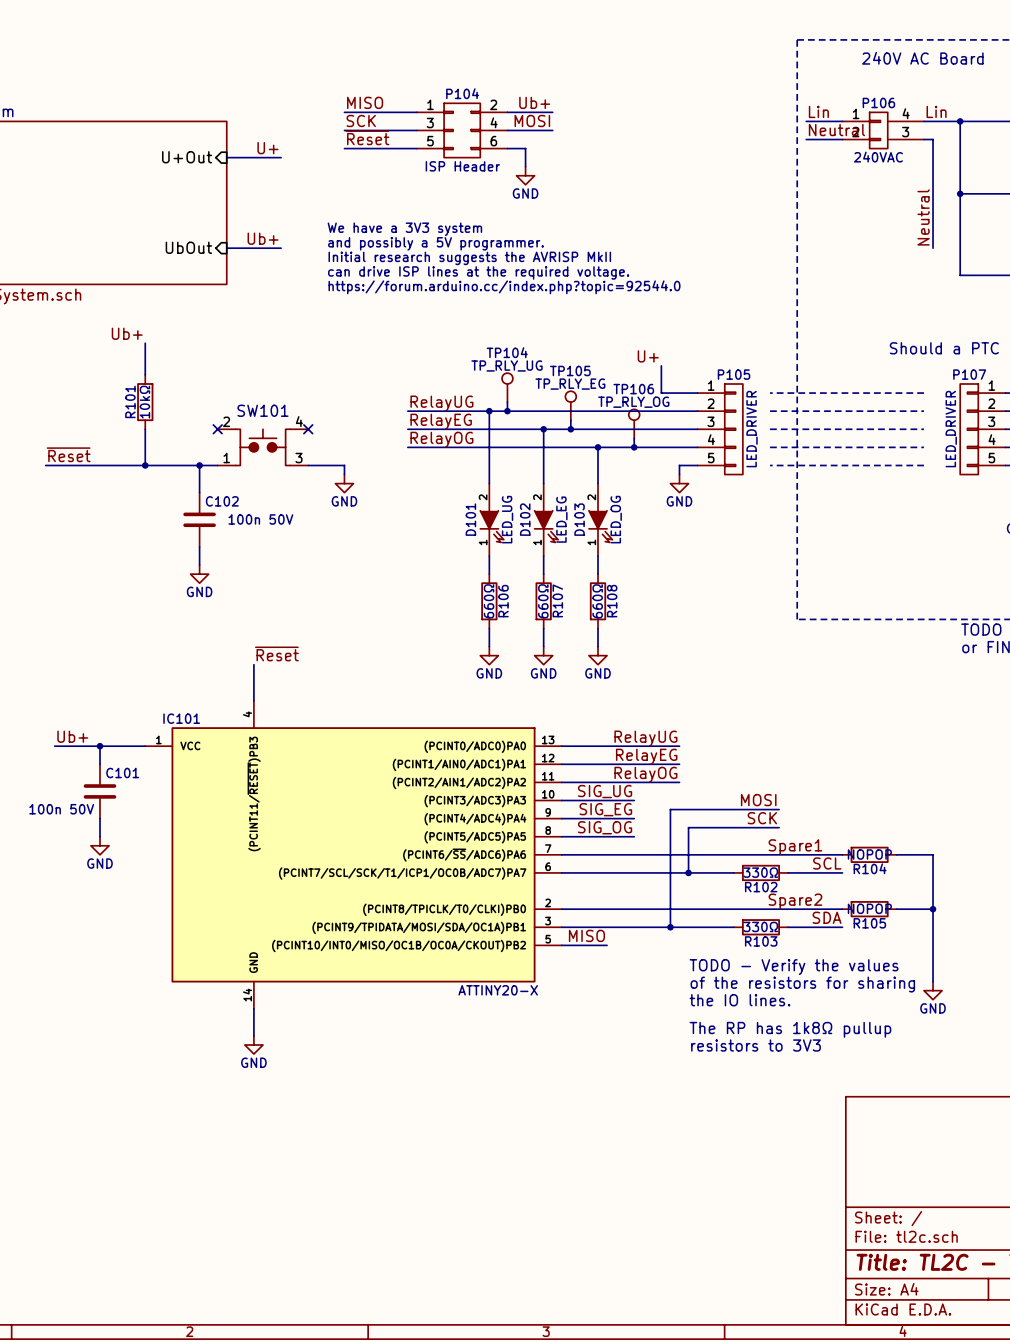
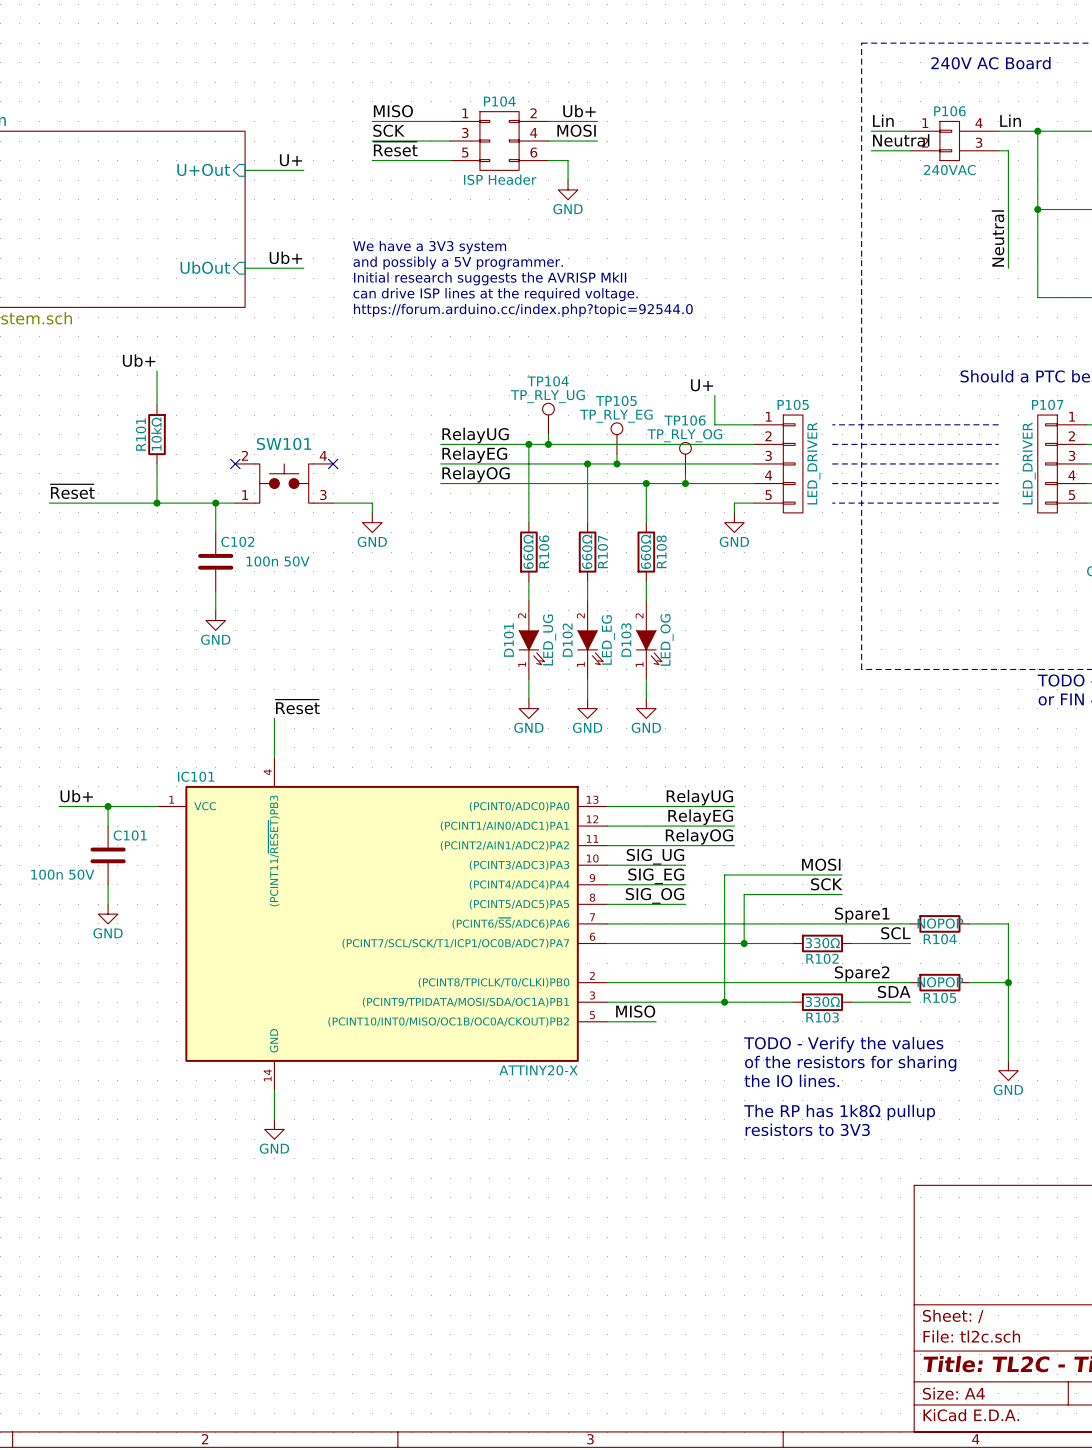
D101 position: (492, 519) -> (531, 640)
D102 position: (546, 519) -> (590, 640)
D103 position: (600, 519) -> (649, 640)
R106 position: (489, 601) -> (528, 552)
R107 position: (543, 601) -> (587, 552)
R108 position: (598, 601) -> (646, 552)

